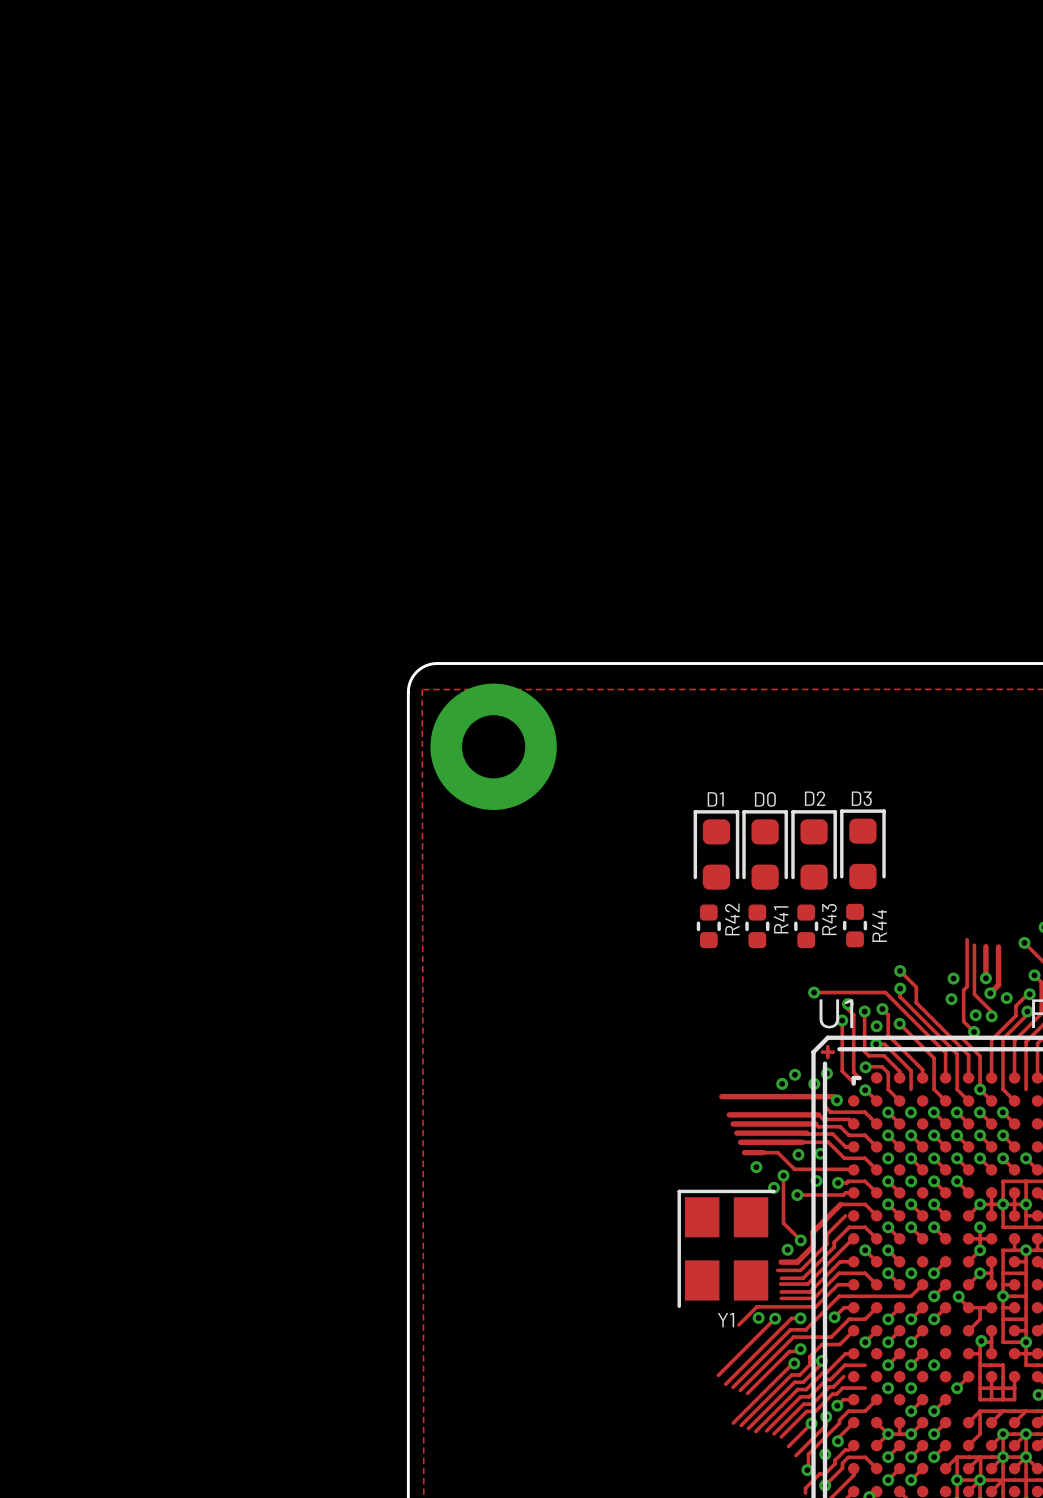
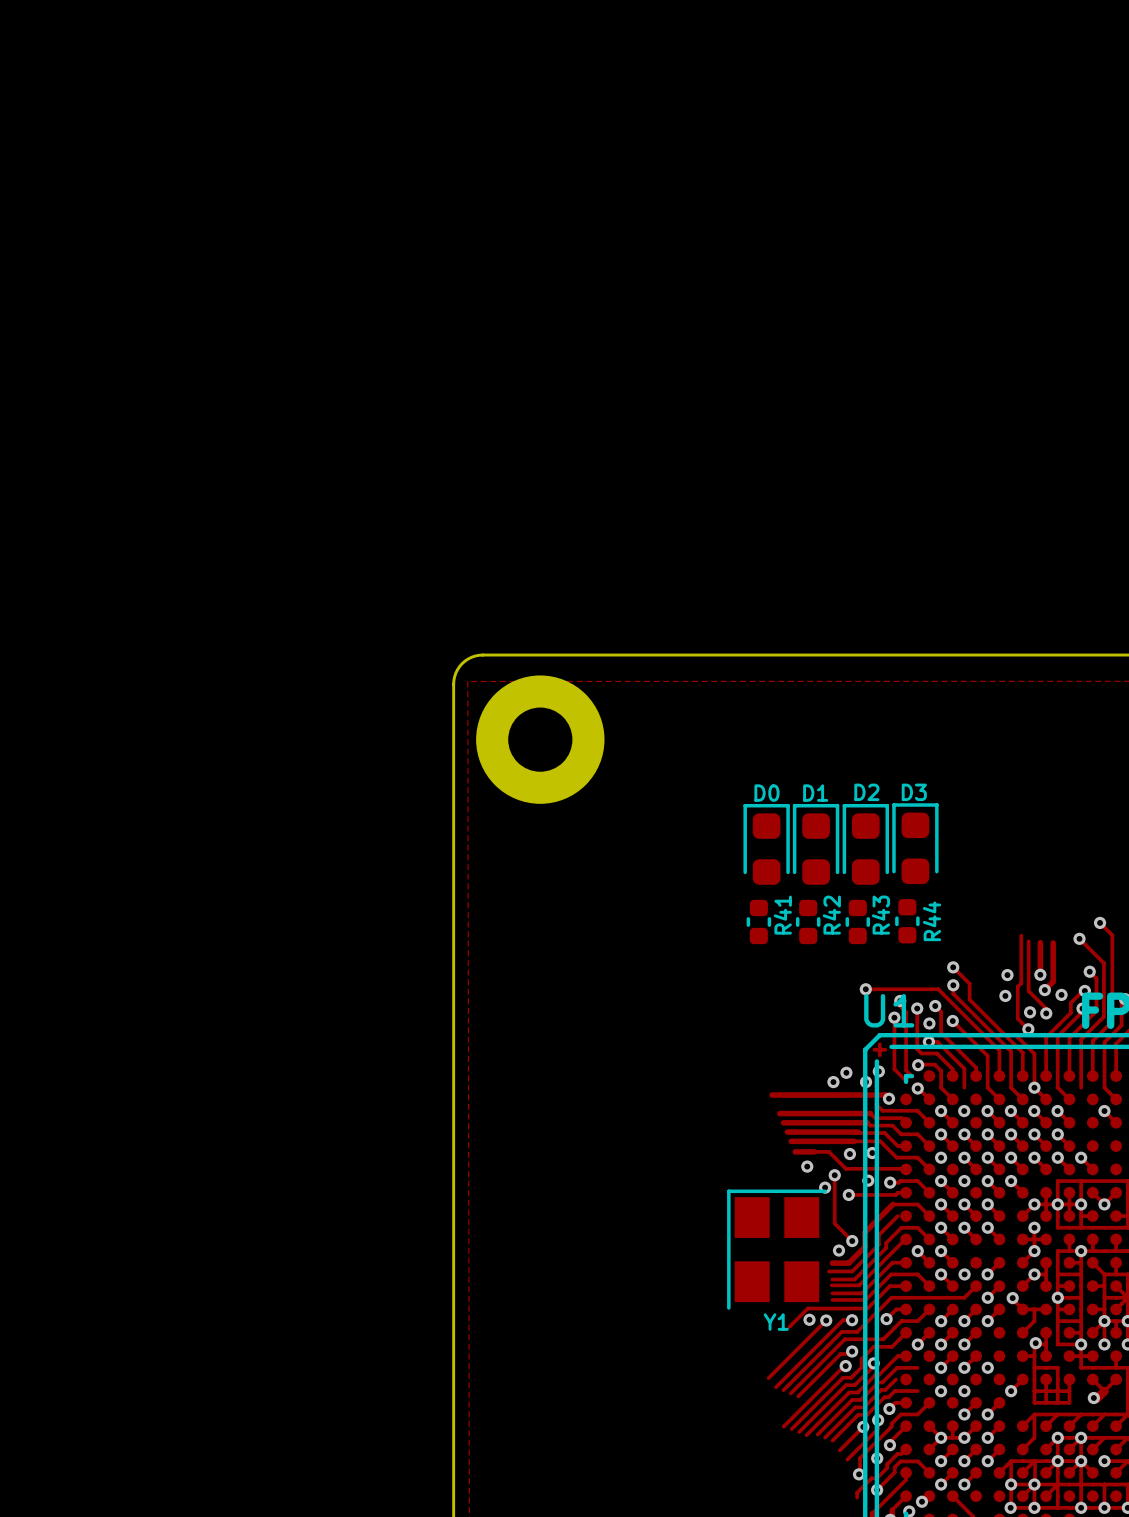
D1 name: D1 (715, 799) -> D0 (766, 793)
D0 name: D0 (765, 799) -> D1 (815, 793)
R42 name: R42 (732, 919) -> R41 (782, 915)
R41 name: R41 (781, 919) -> R42 (831, 915)

